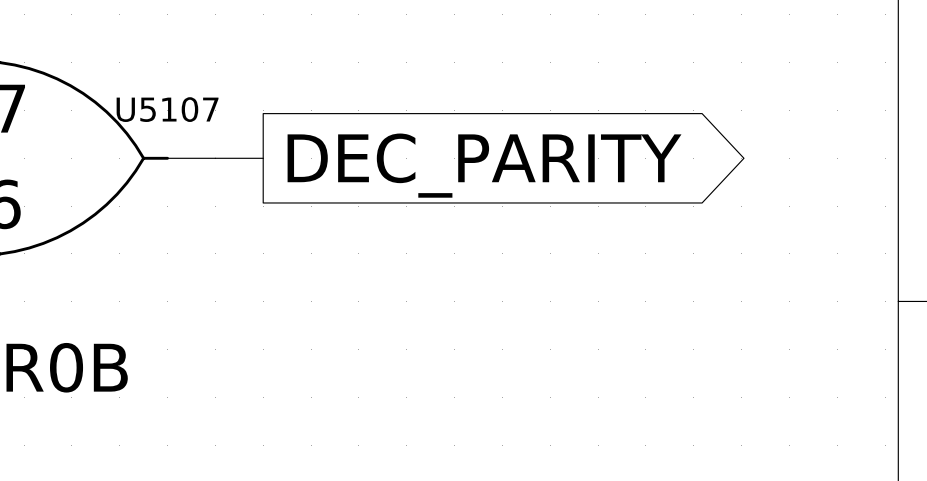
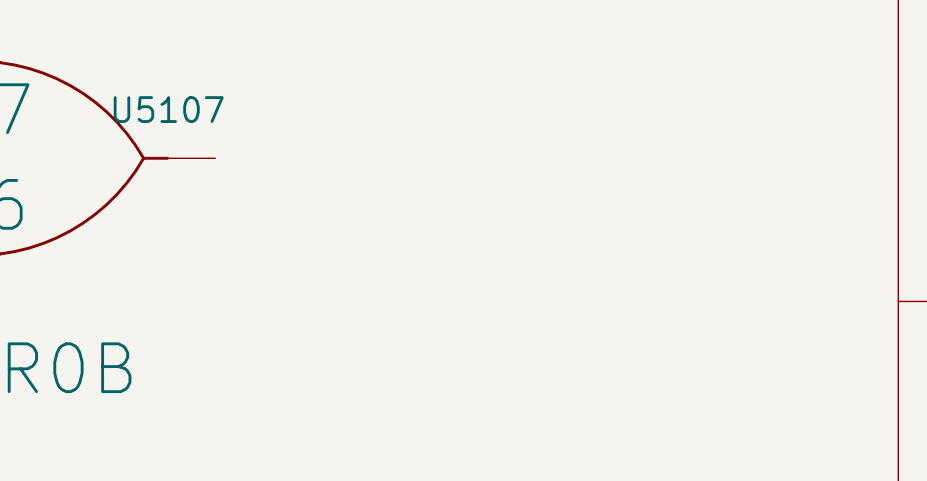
wire: (215, 158) (263, 158) -> none
global label: DEC_PARITY (484, 165) -> none

